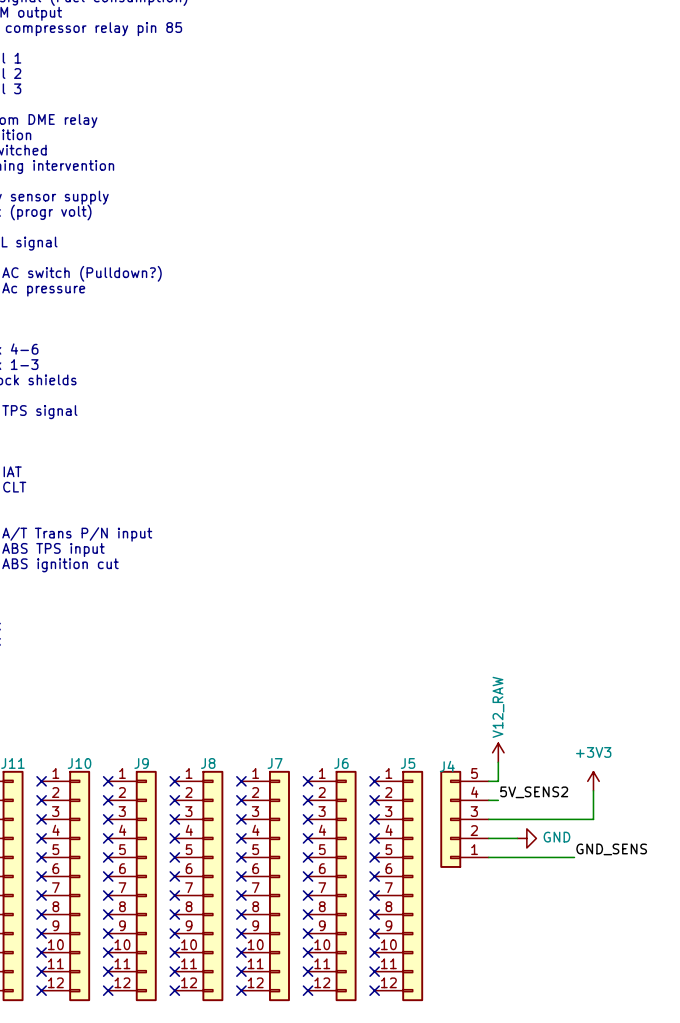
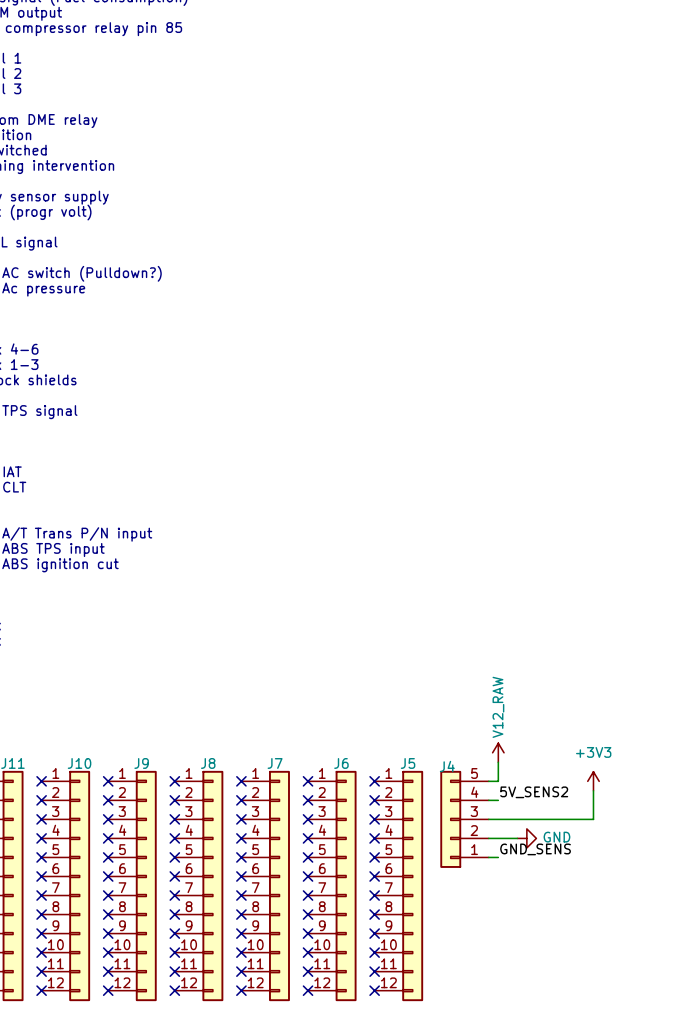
label position: GND_SENS (611, 849) -> GND_SENS (535, 849)
wire: (498, 857) (574, 857) -> none

